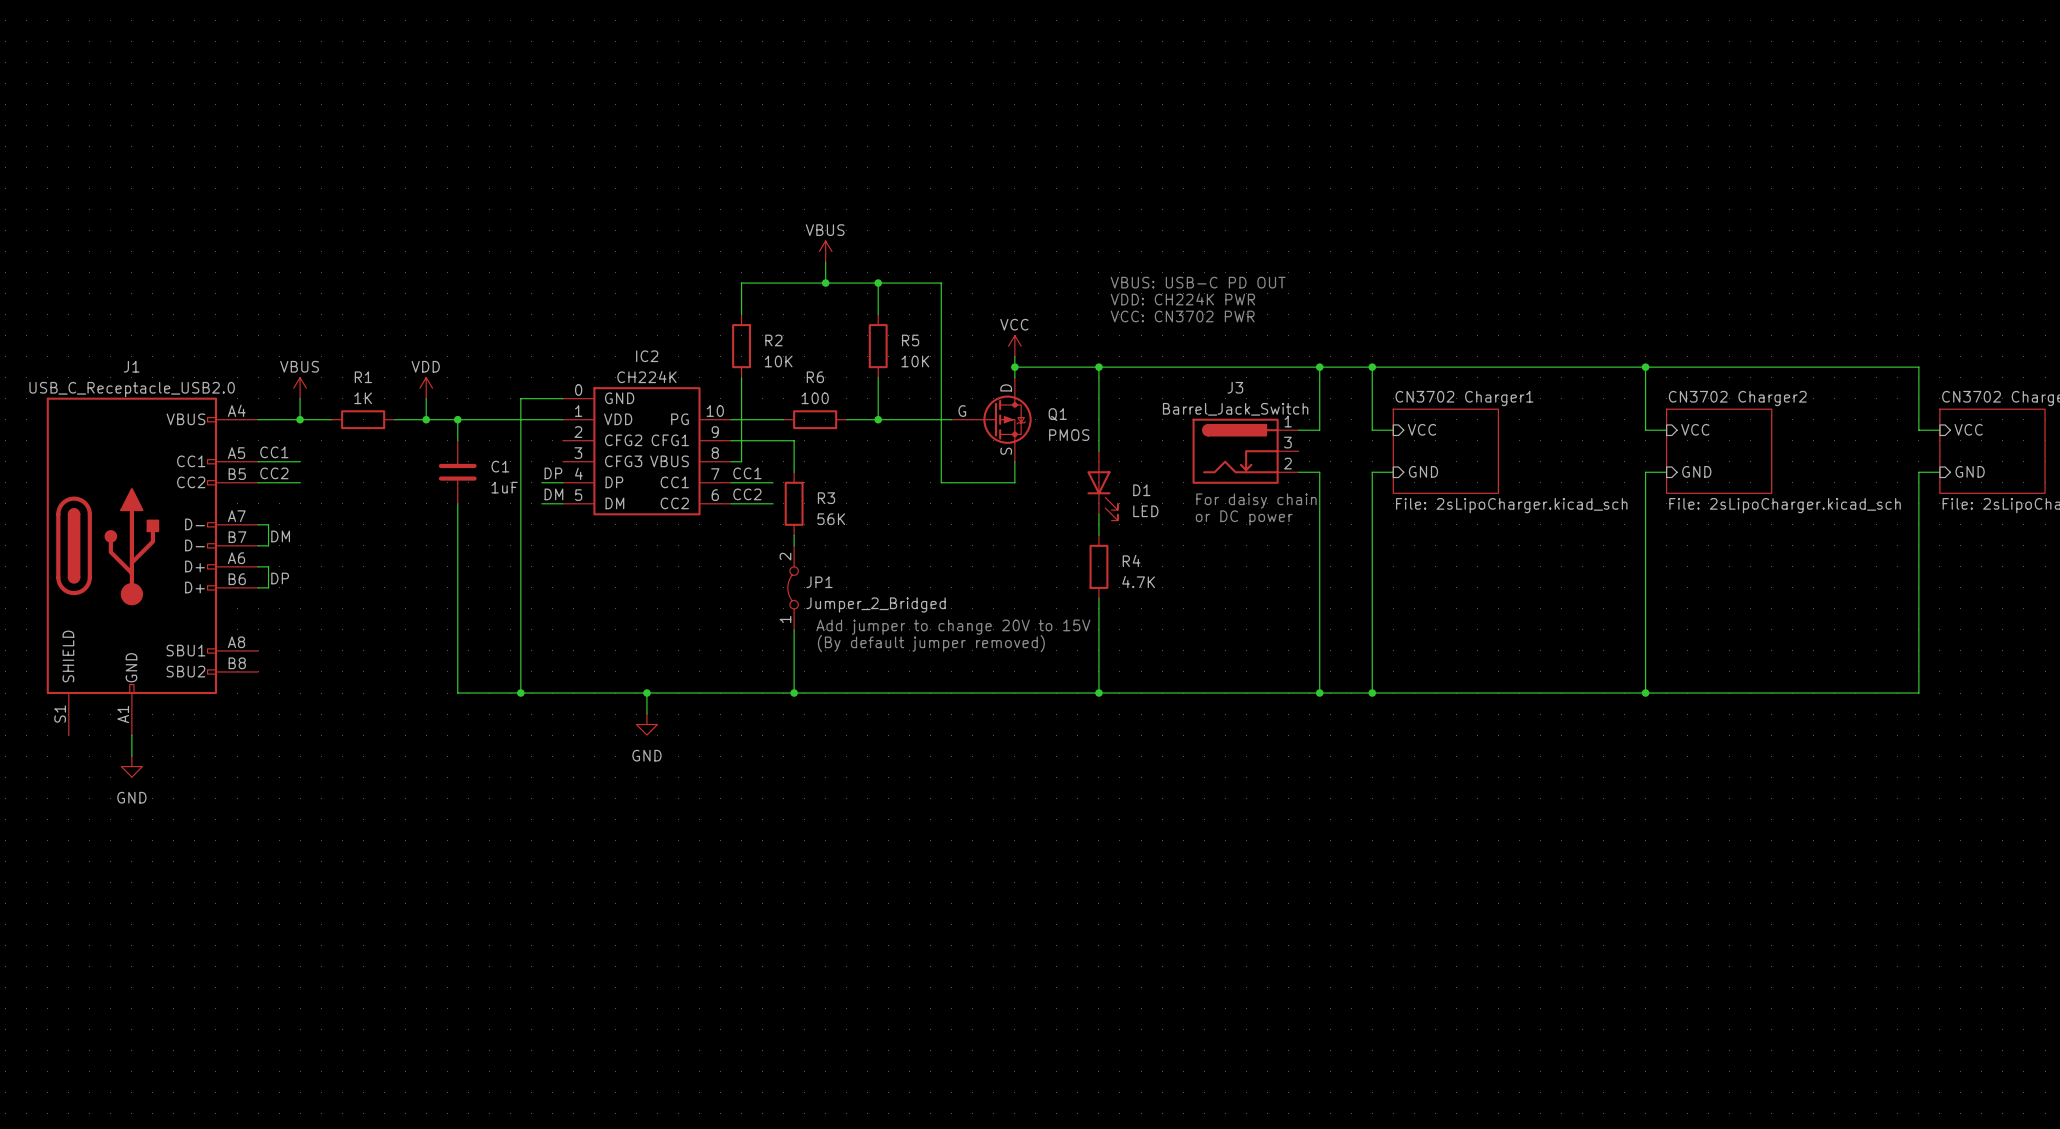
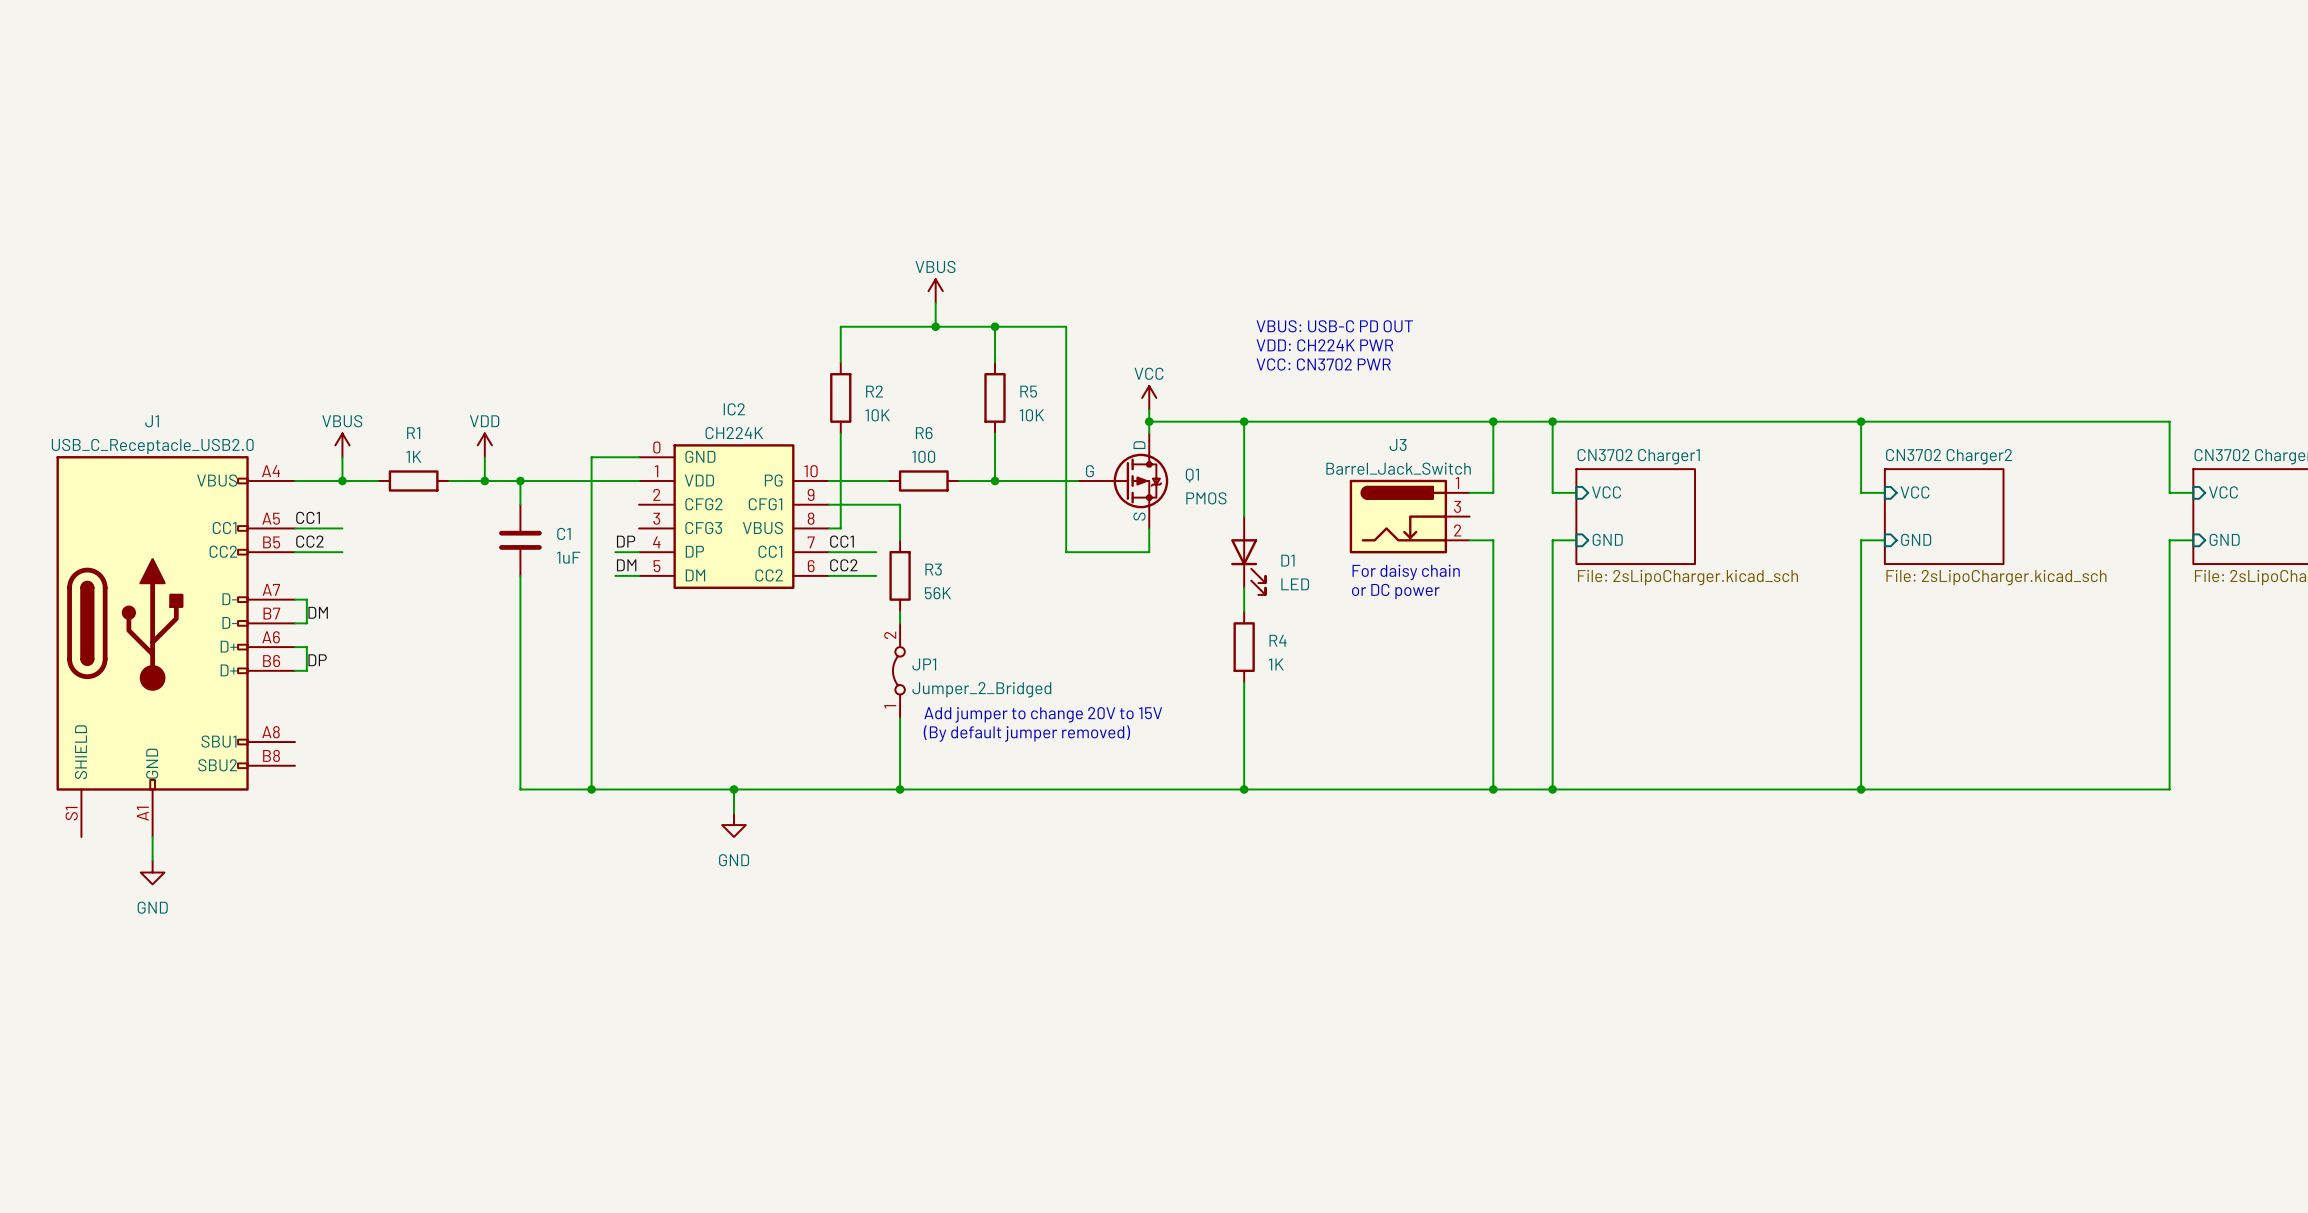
R4 value: 4.7K (1138, 581) -> 1K (1276, 664)

